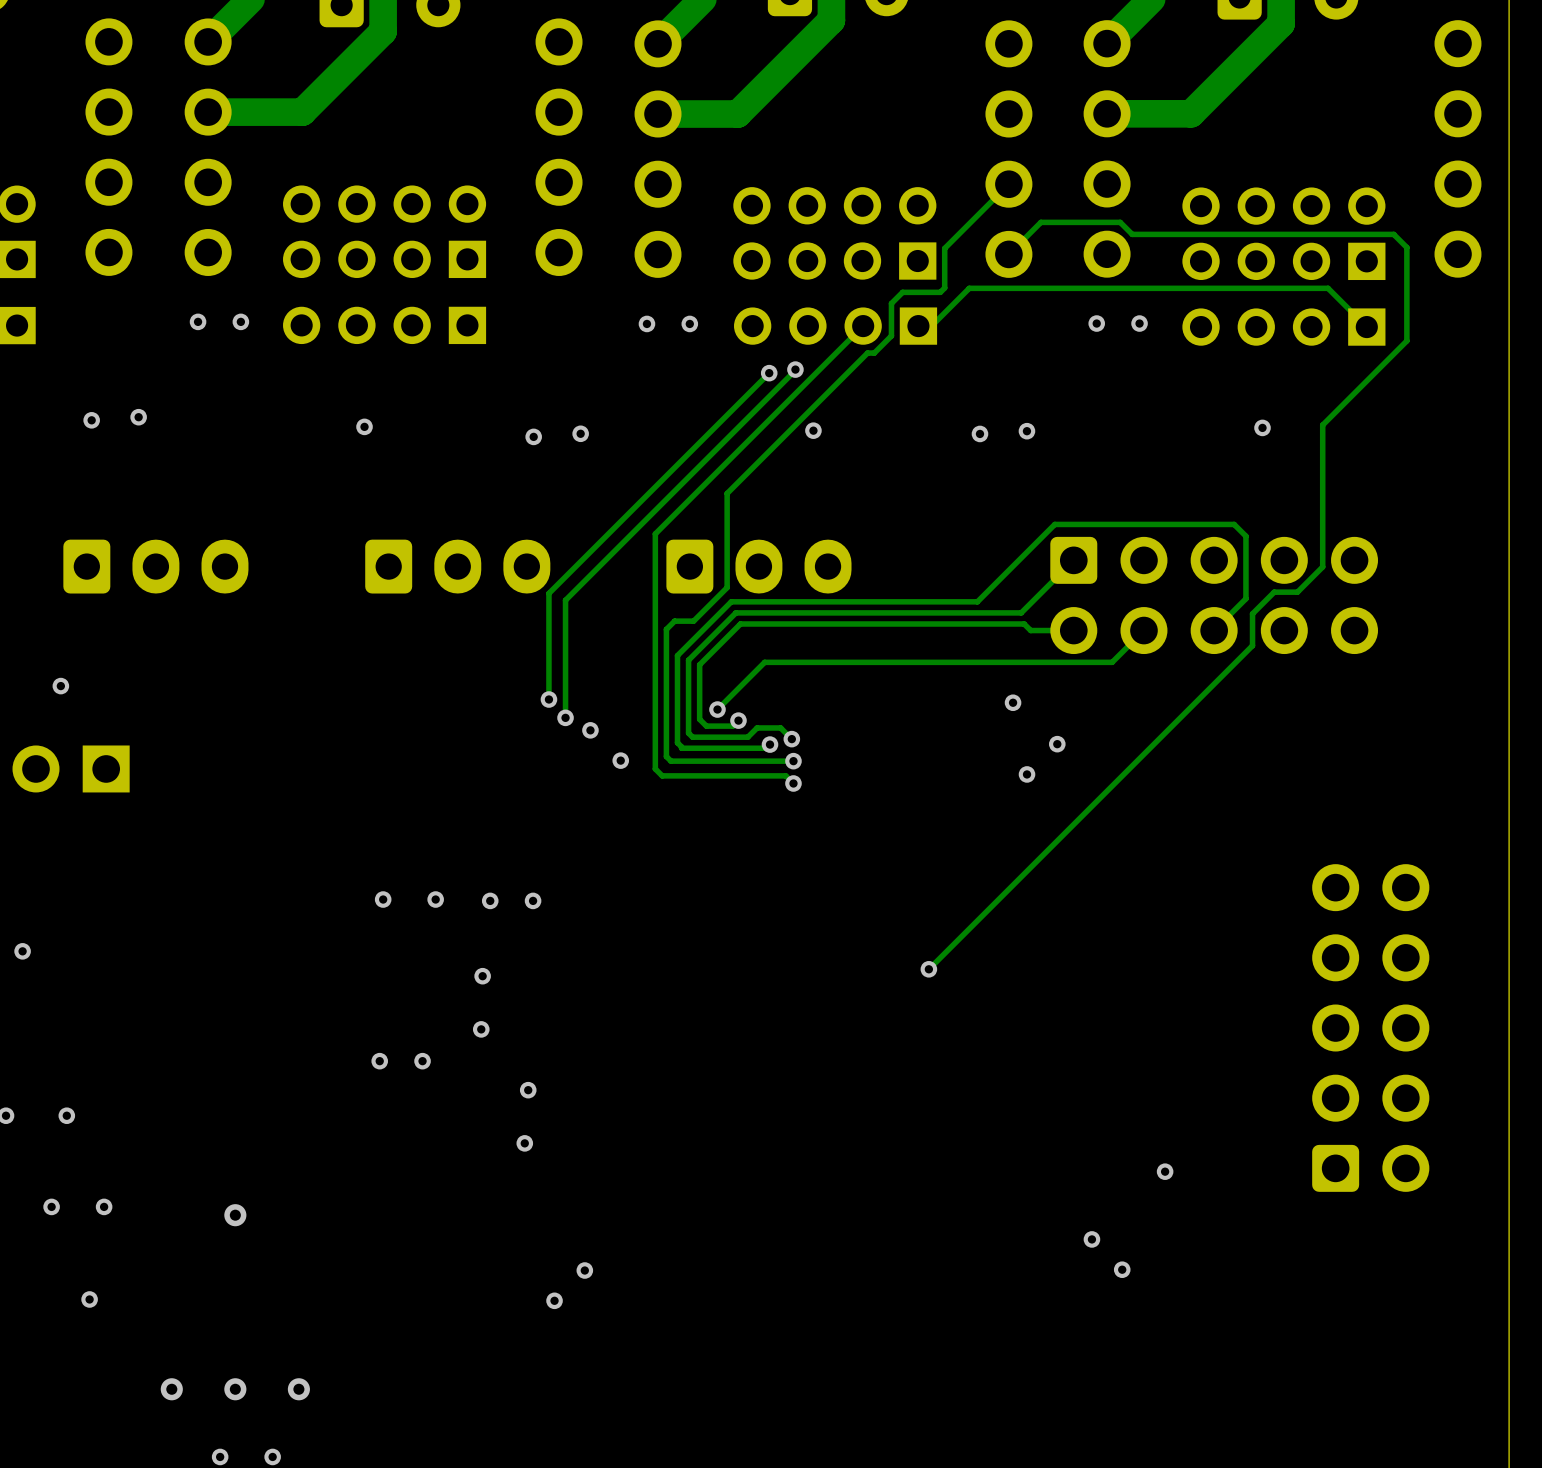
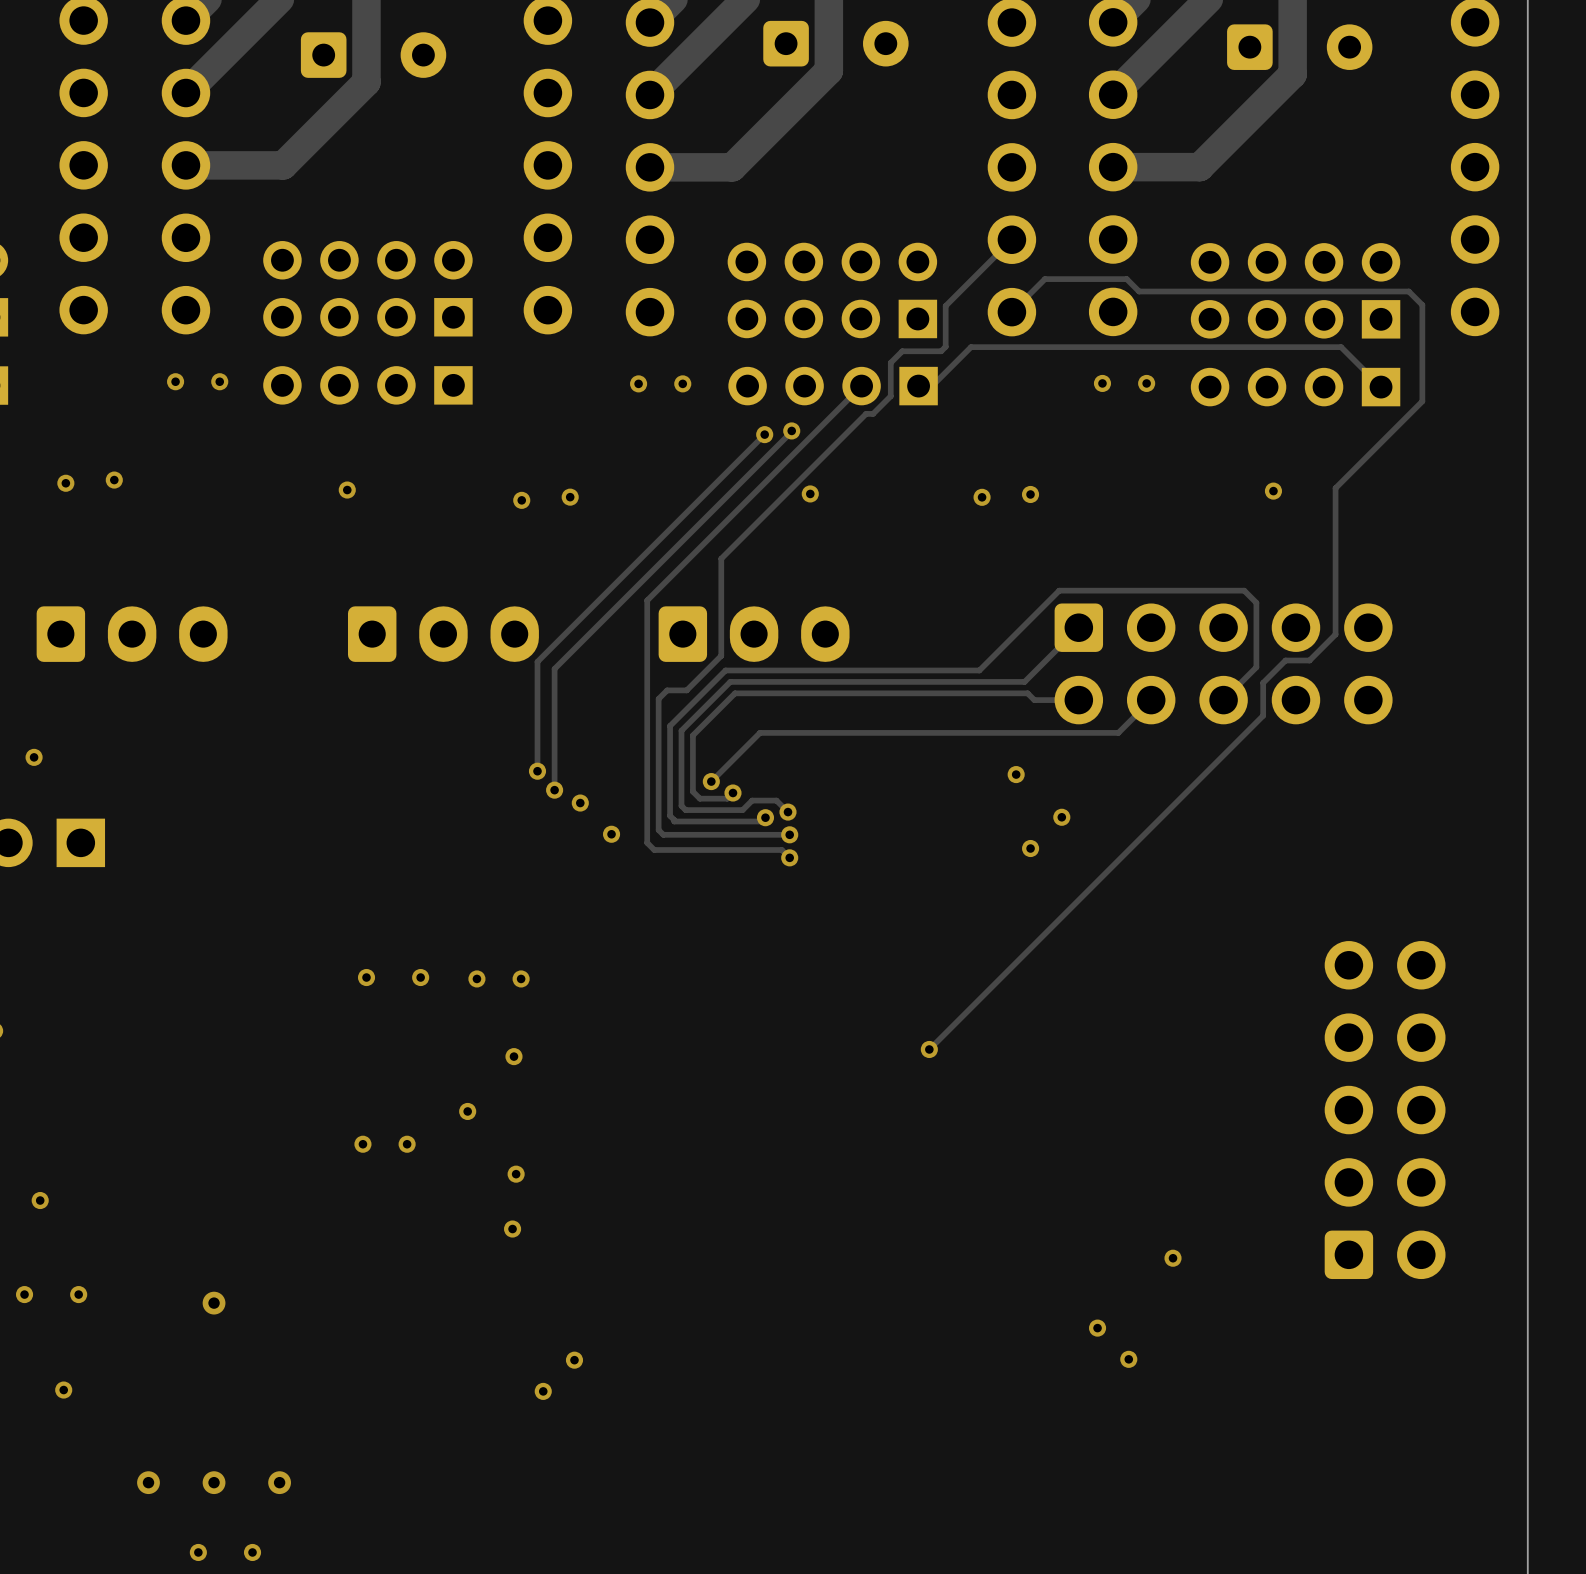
via position: (482, 976) -> (513, 1056)

